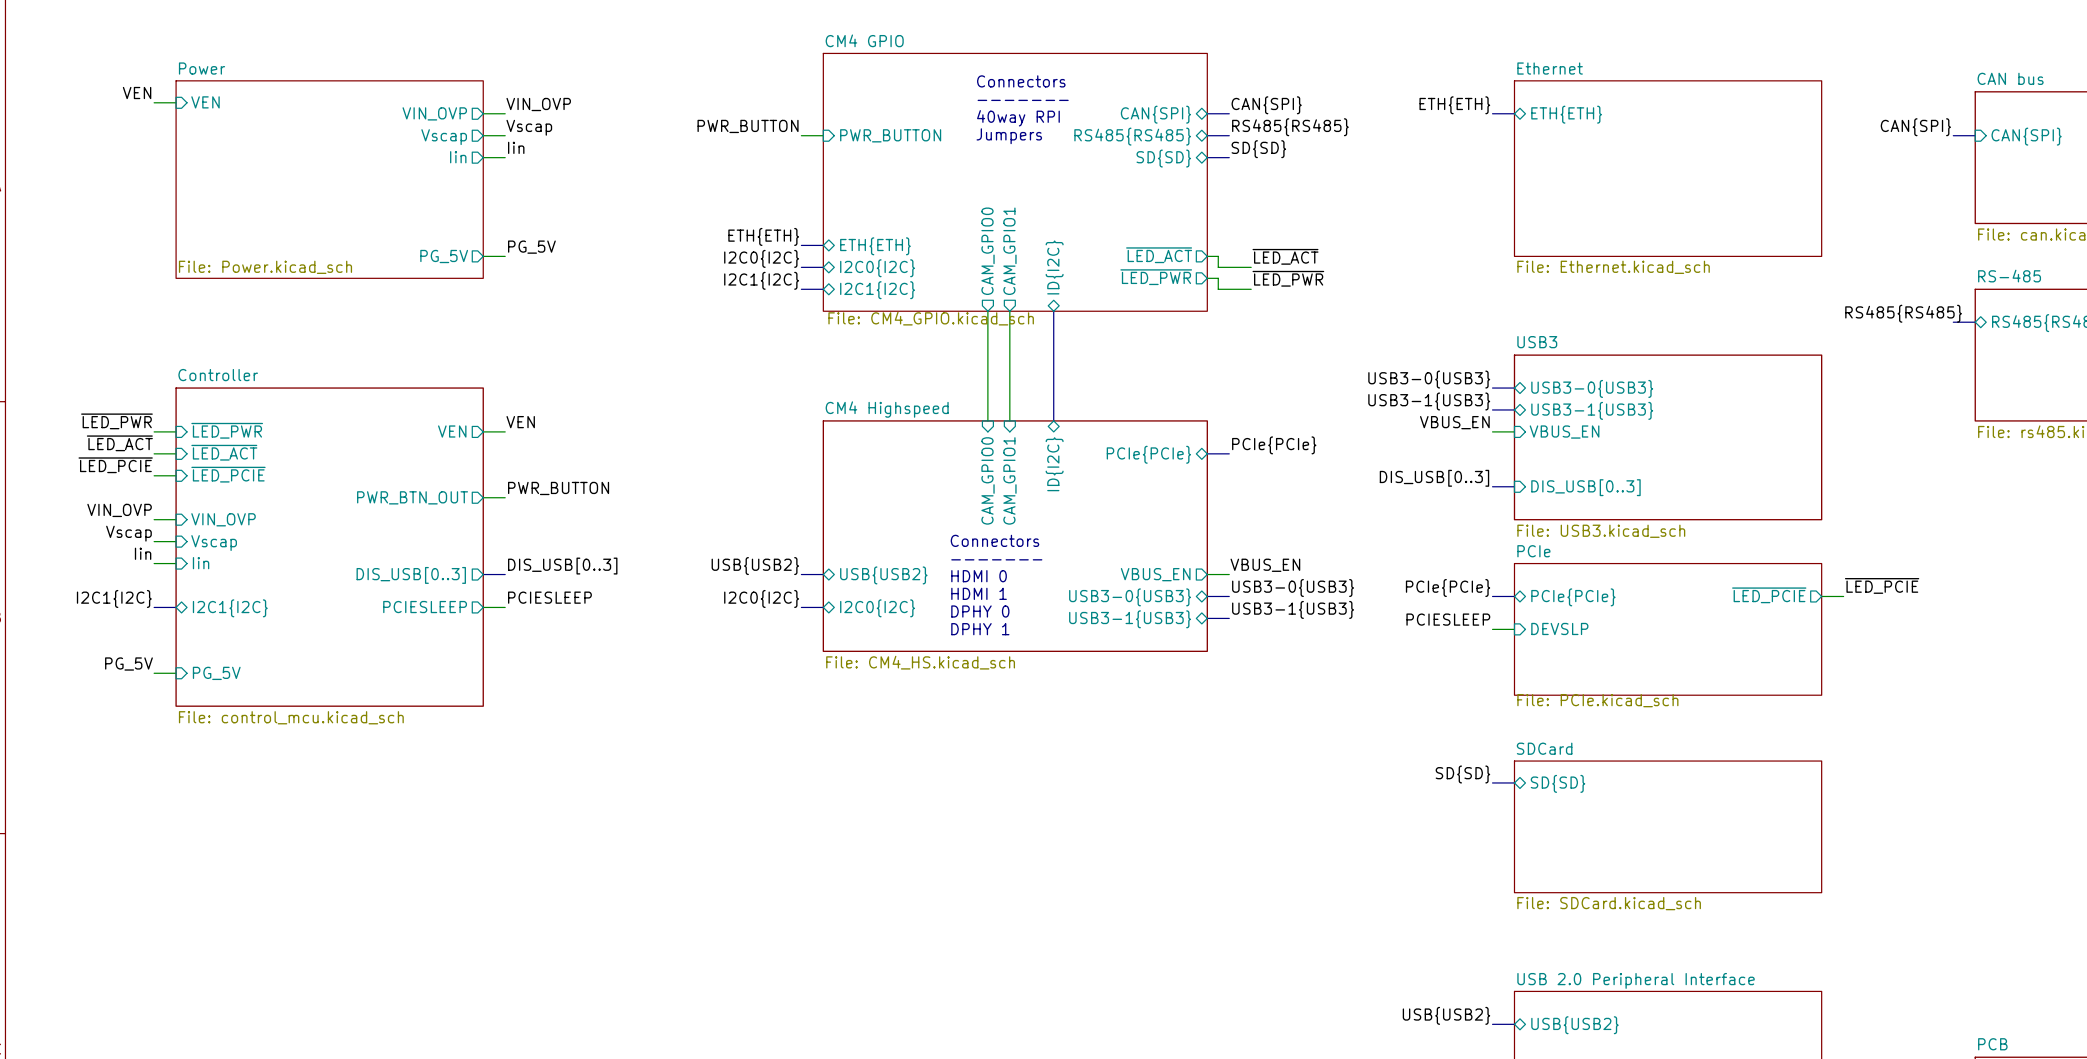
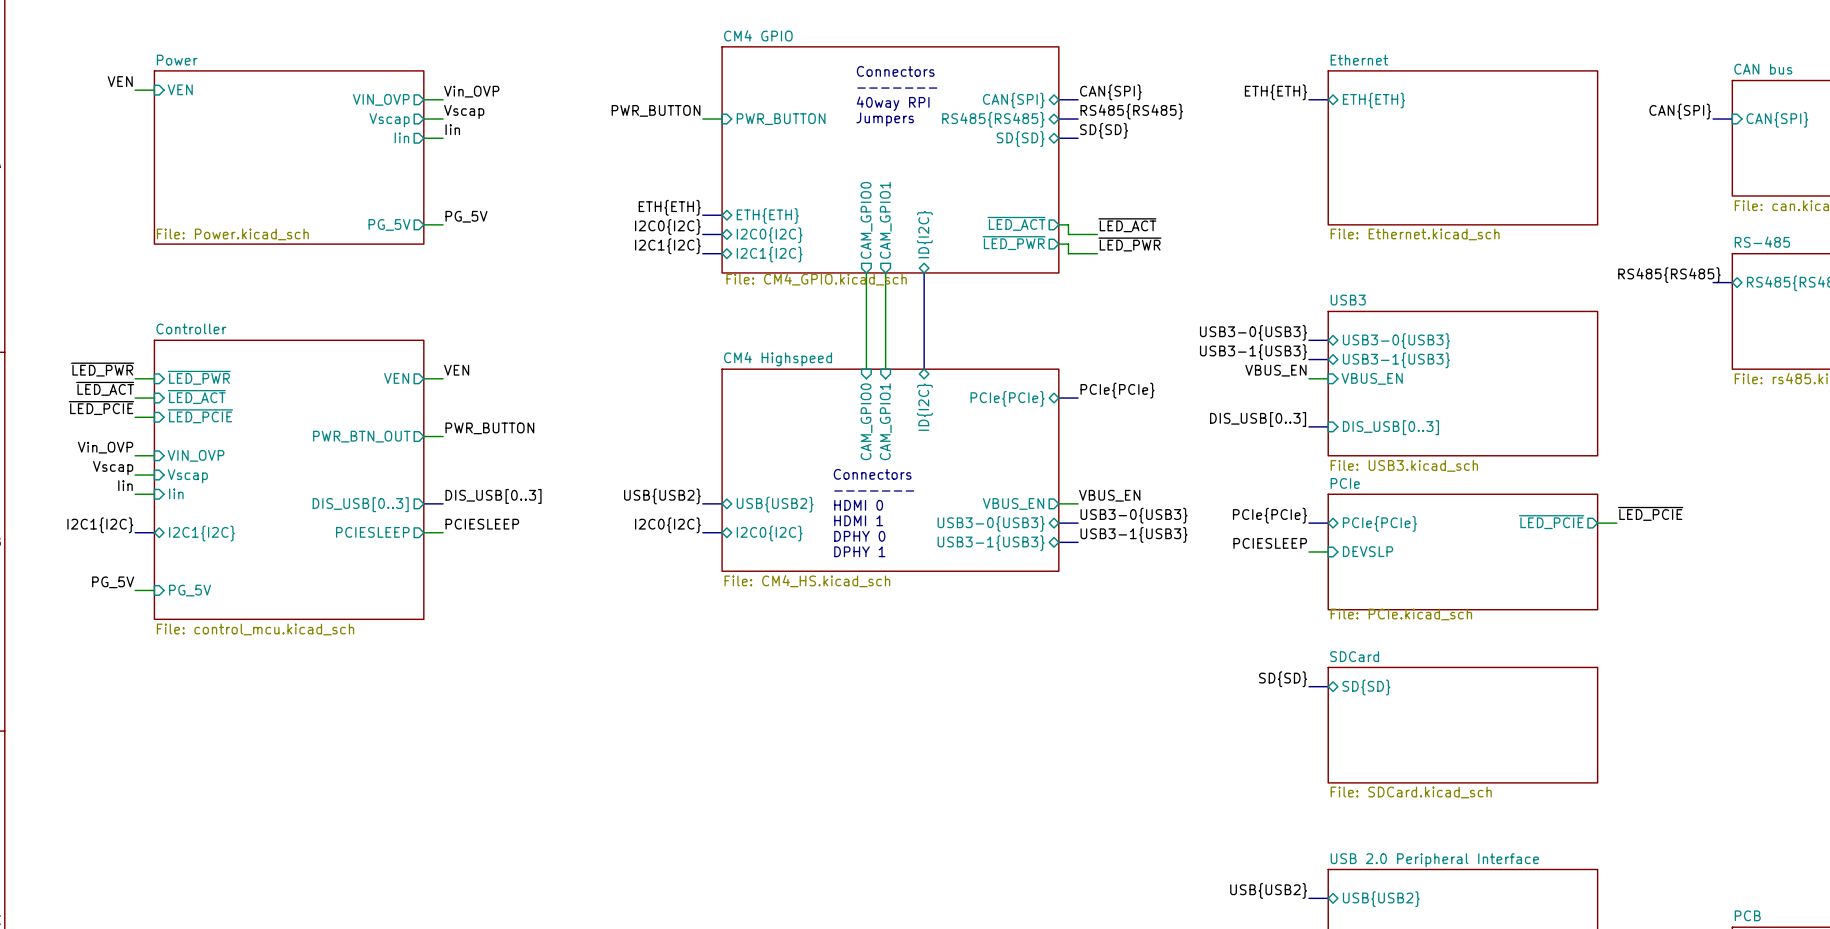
label: VIN_OVP (538, 104) -> Vin_OVP (471, 91)
label: VIN_OVP (119, 510) -> Vin_OVP (105, 447)

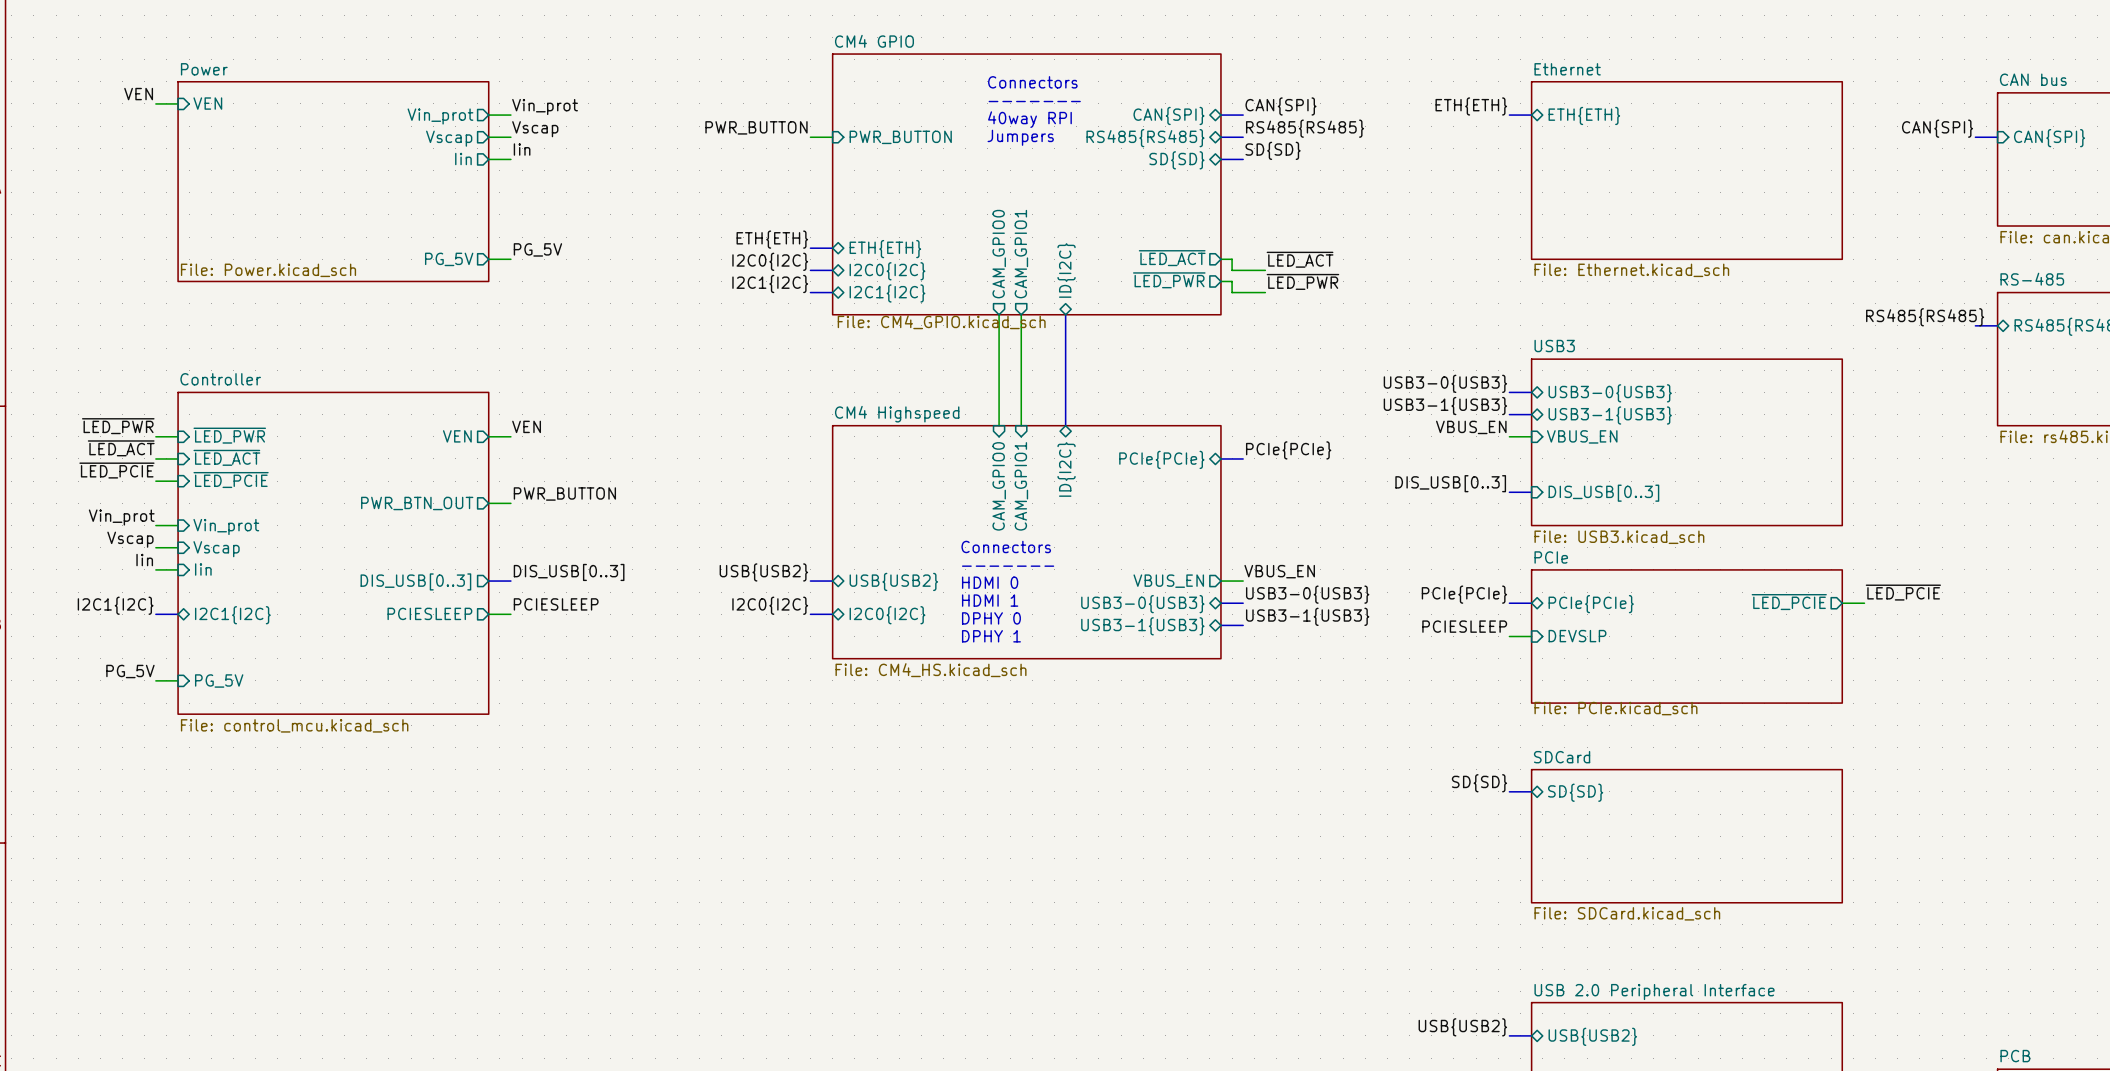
label: Vin_OVP (471, 91) -> Vin_prot (545, 107)
sheet pin: VIN_OVP (381, 99) -> Vin_prot (440, 116)
label: Vin_OVP (105, 447) -> Vin_prot (121, 517)
sheet pin: VIN_OVP (196, 455) -> Vin_prot (226, 526)

